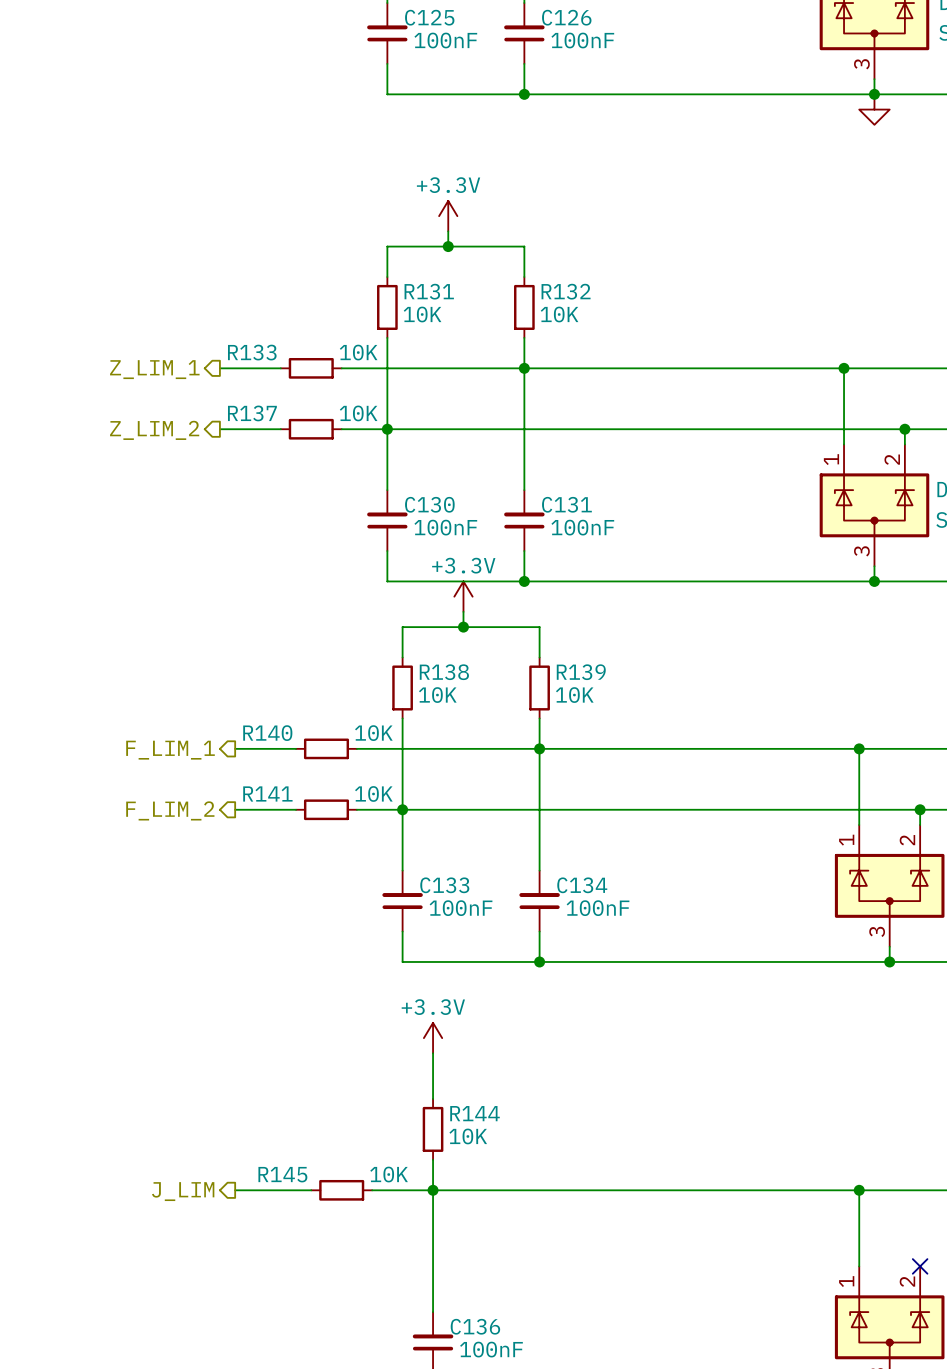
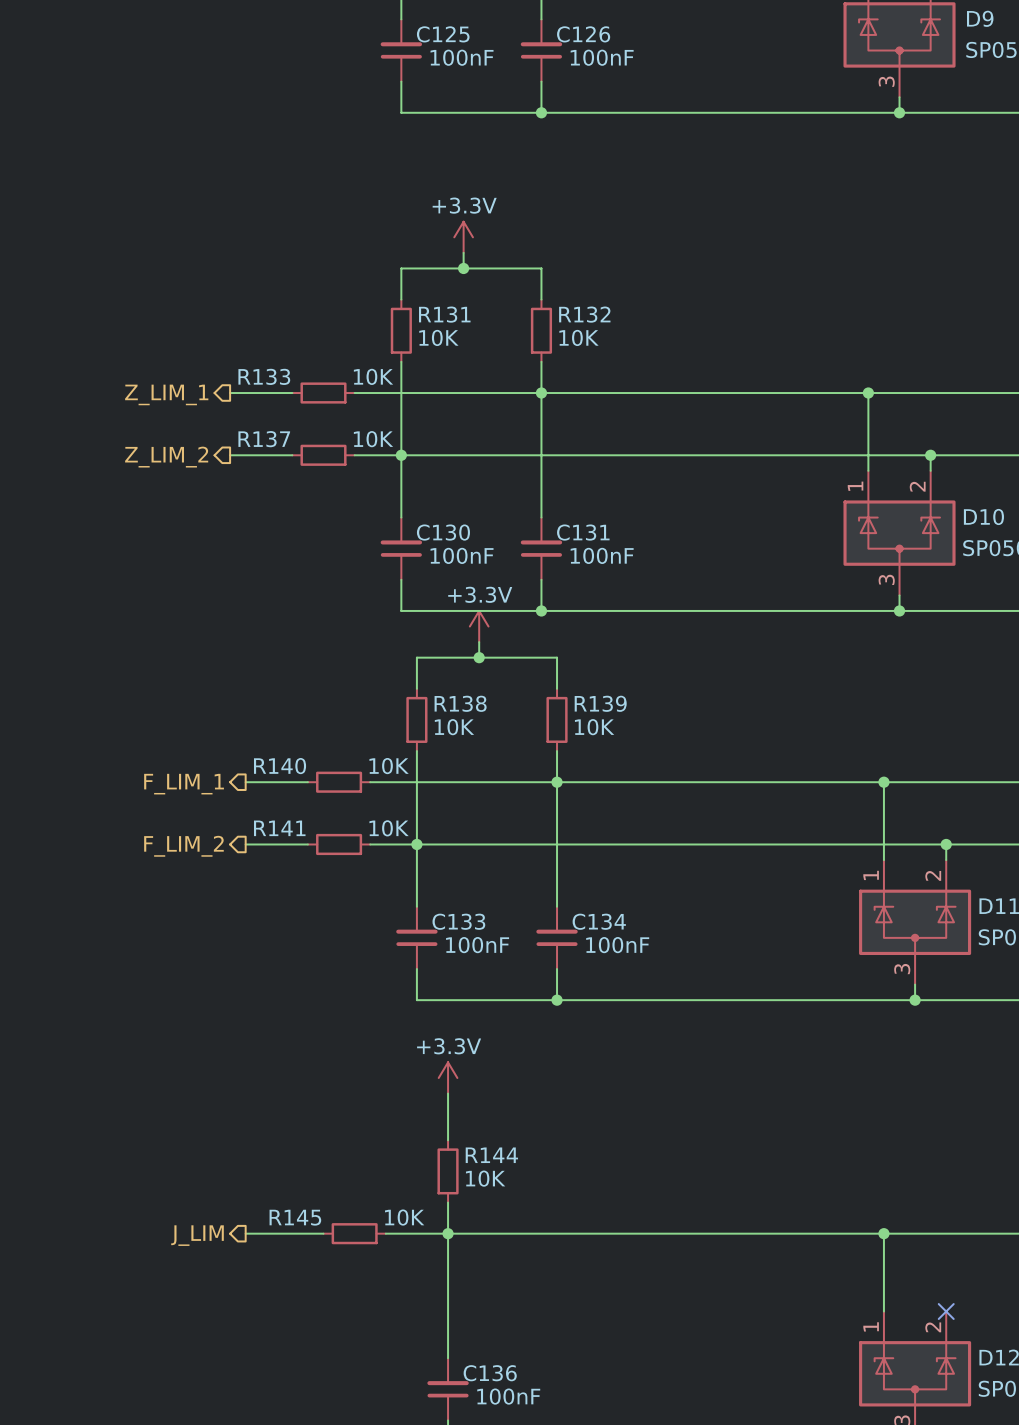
power symbol: (874, 109) -> none

